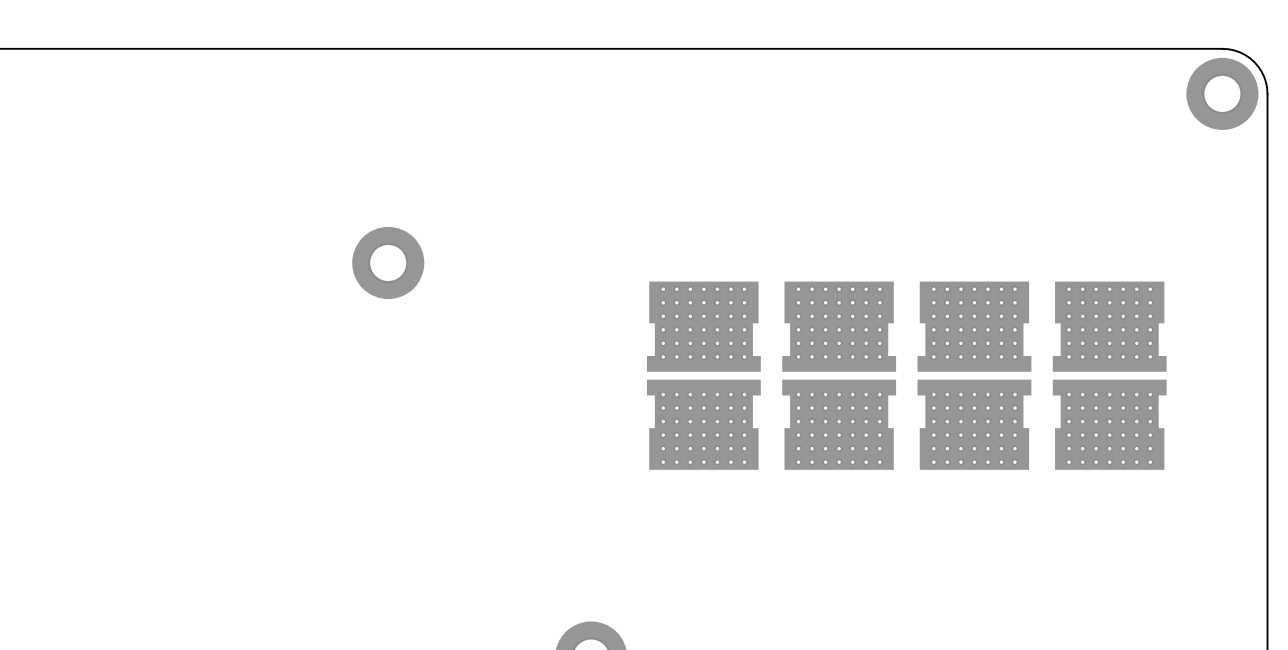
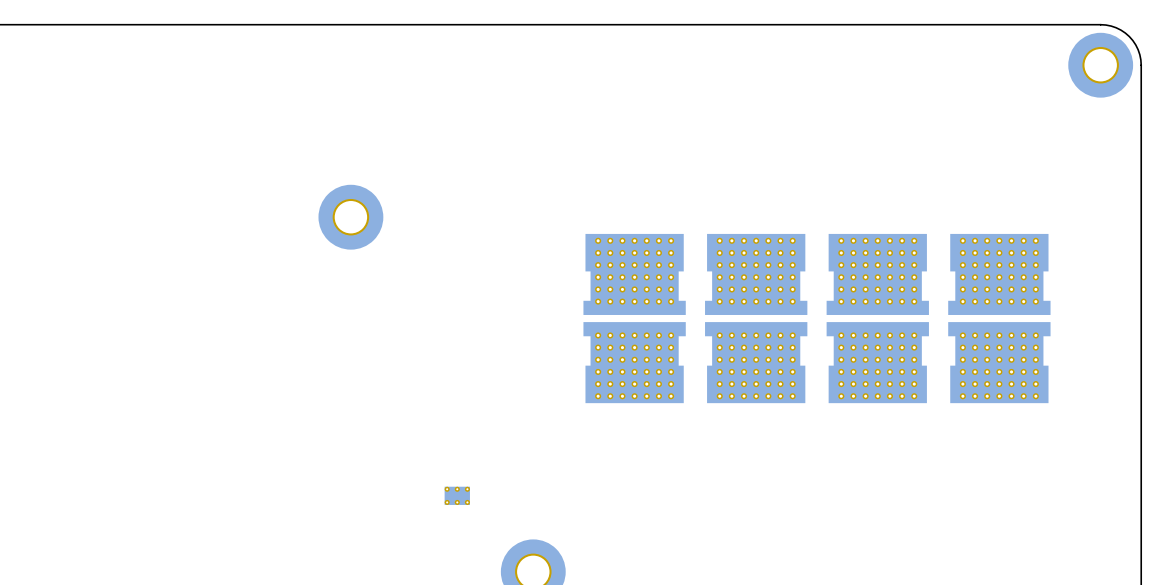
part: none -> (457, 495)

